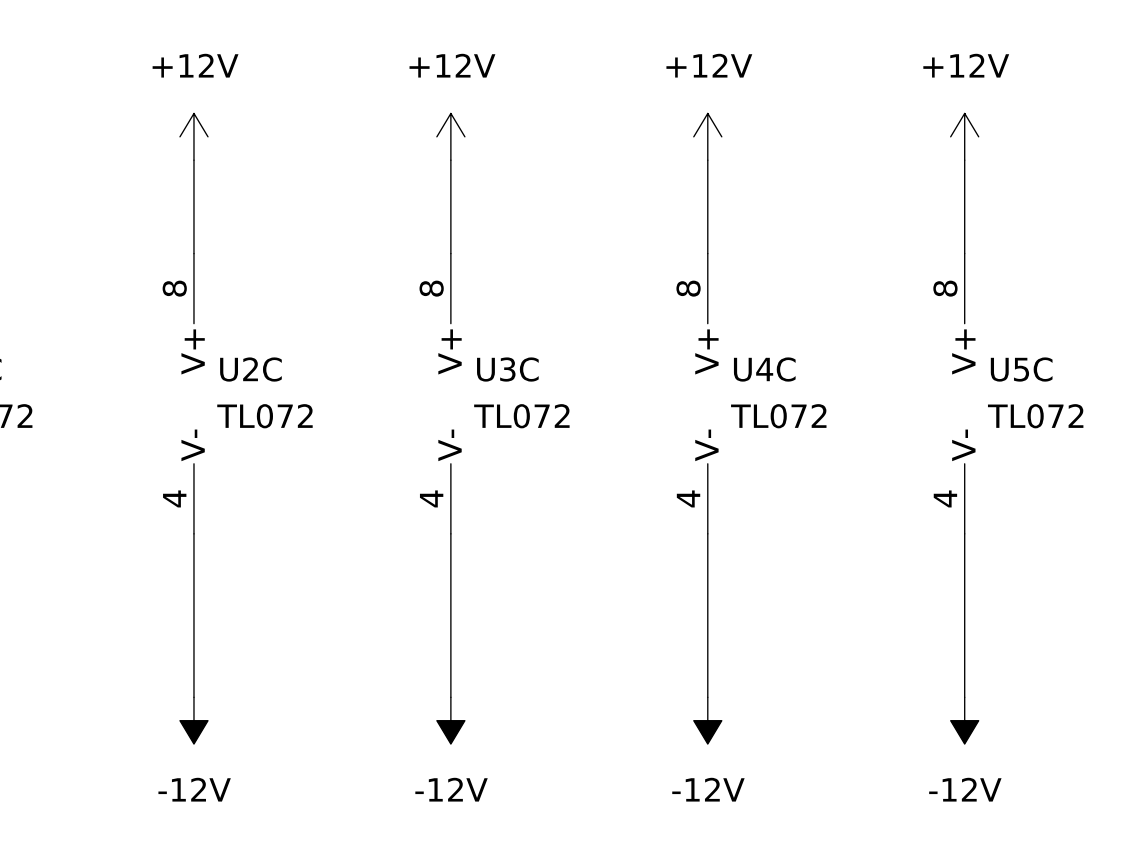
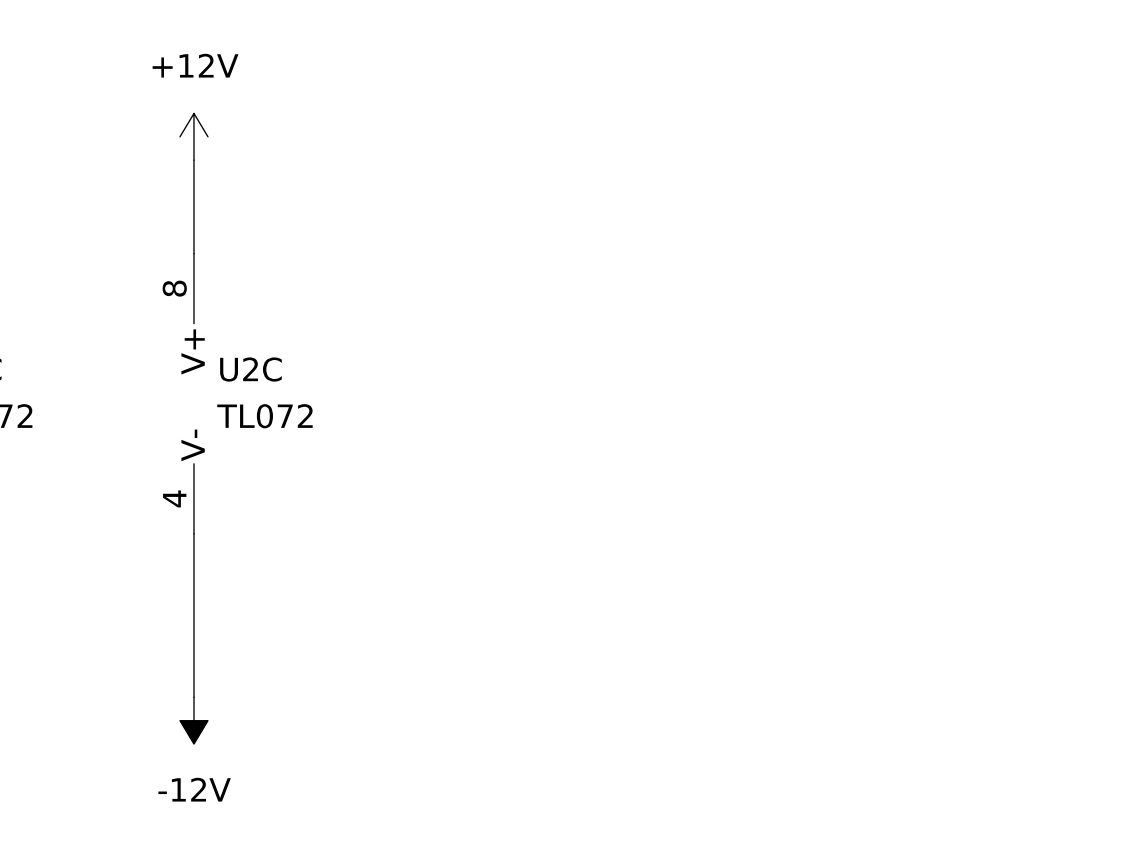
power symbol: +12V (450, 136) -> none
power symbol: +12V (707, 136) -> none
power symbol: +12V (964, 136) -> none
wire: (450, 160) (450, 253) -> none
wire: (707, 160) (707, 253) -> none
wire: (964, 160) (964, 253) -> none
U3C: TL072 (450, 393) -> none
U4C: TL072 (707, 393) -> none
U5C: TL072 (964, 393) -> none
wire: (450, 533) (450, 697) -> none
wire: (707, 533) (707, 697) -> none
wire: (964, 533) (964, 697) -> none
power symbol: -12V (450, 720) -> none
power symbol: -12V (707, 720) -> none
power symbol: -12V (964, 720) -> none

